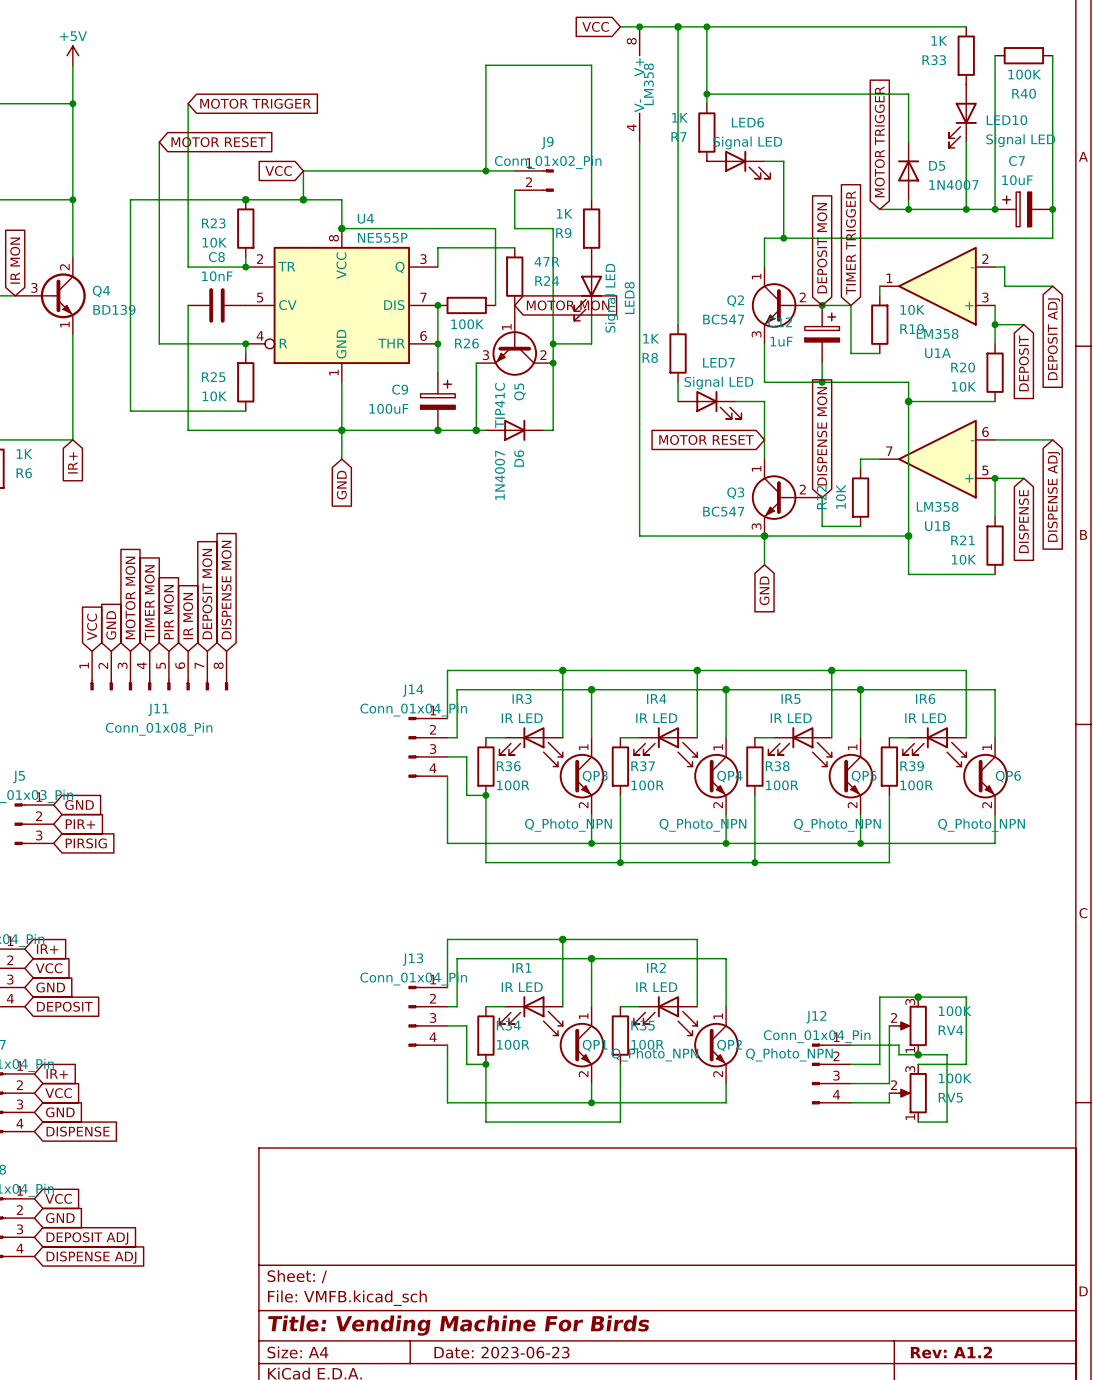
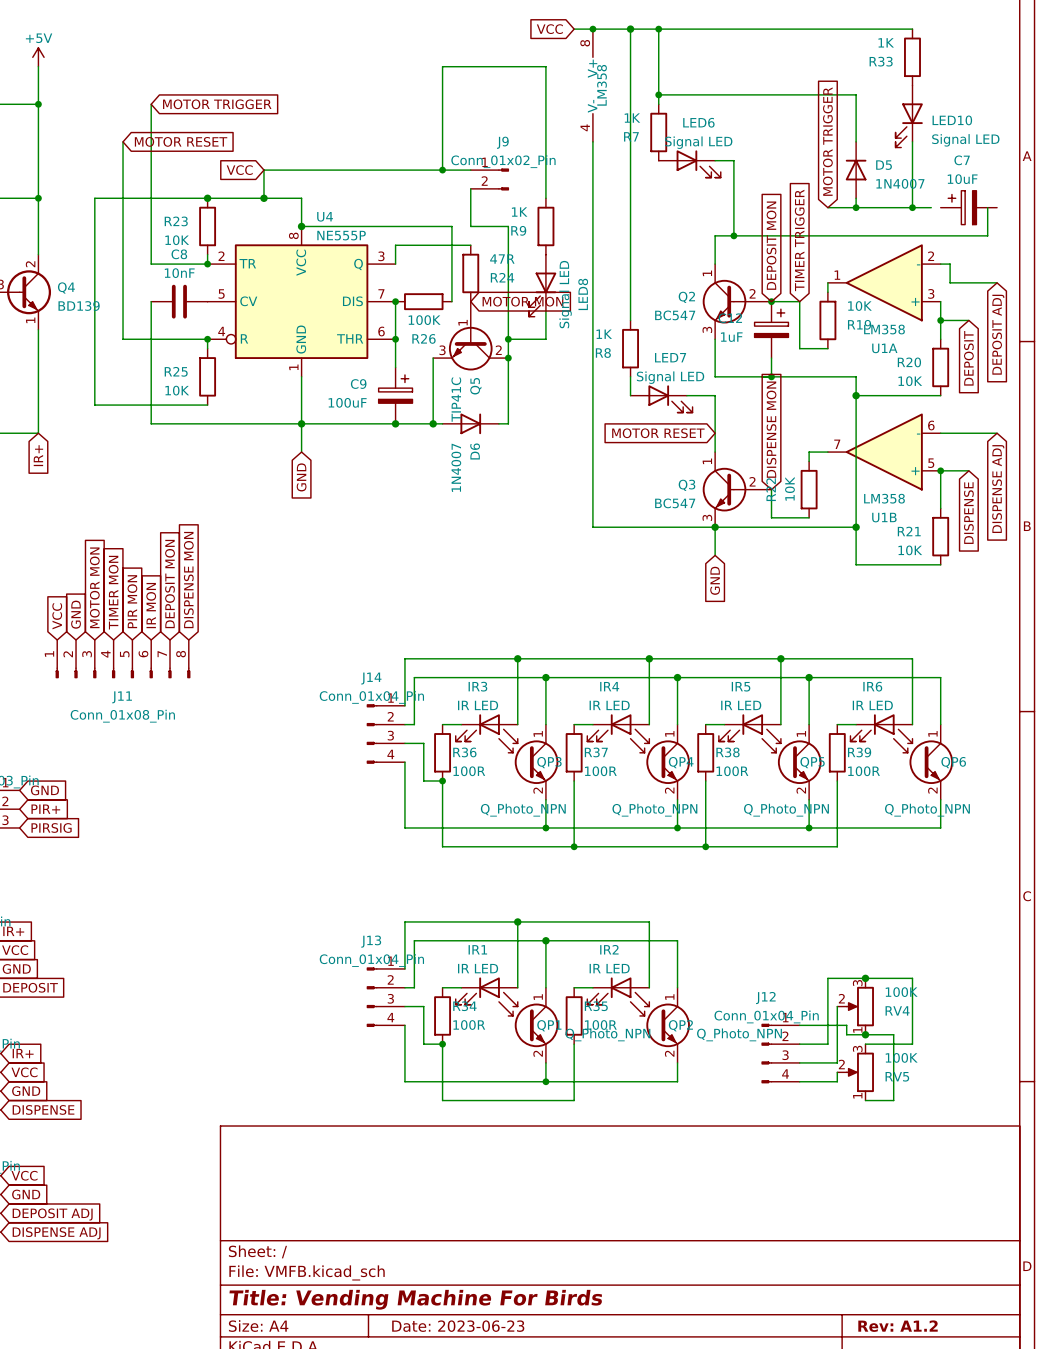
wire: (995, 55) (995, 209) (985, 209) -> none
R40: 100K (1023, 55) -> none
wire: (1052, 55) (1052, 238) (1043, 238) -> (987, 207) (987, 235)
junction: (995, 209) -> none
junction: (1052, 209) -> none

